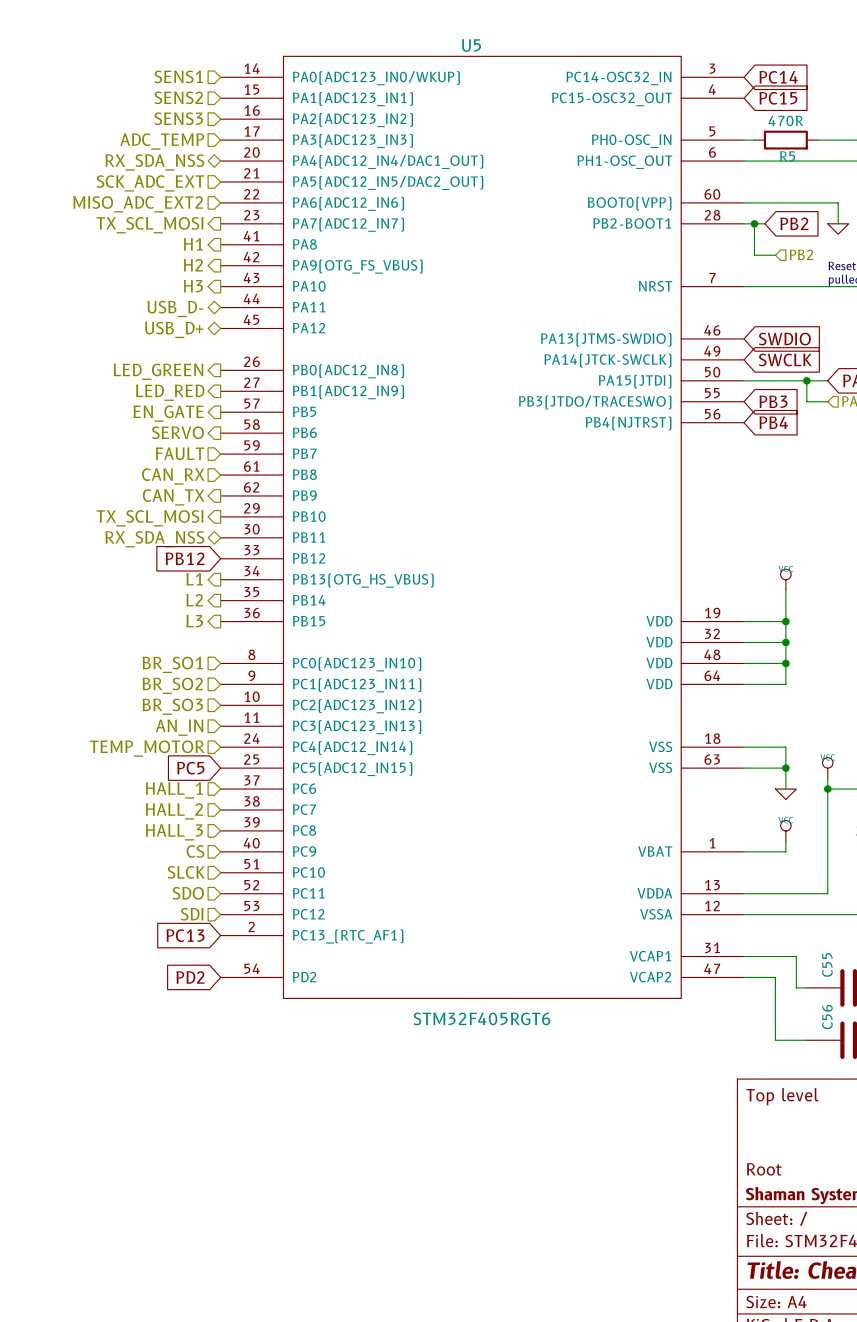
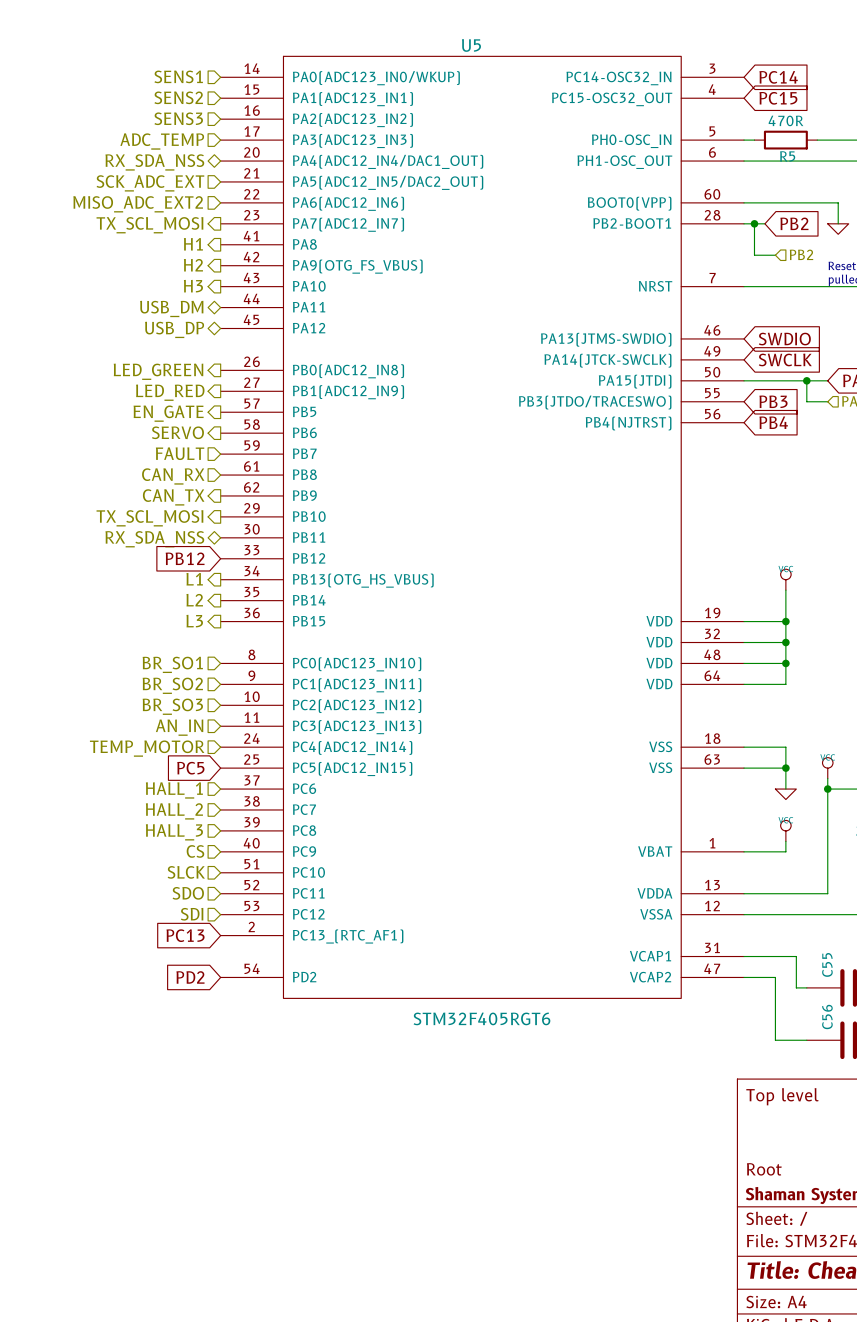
hierarchical label: USB_D- (175, 308) -> USB_DM (171, 308)
hierarchical label: USB_D+ (174, 329) -> USB_DP (174, 329)

